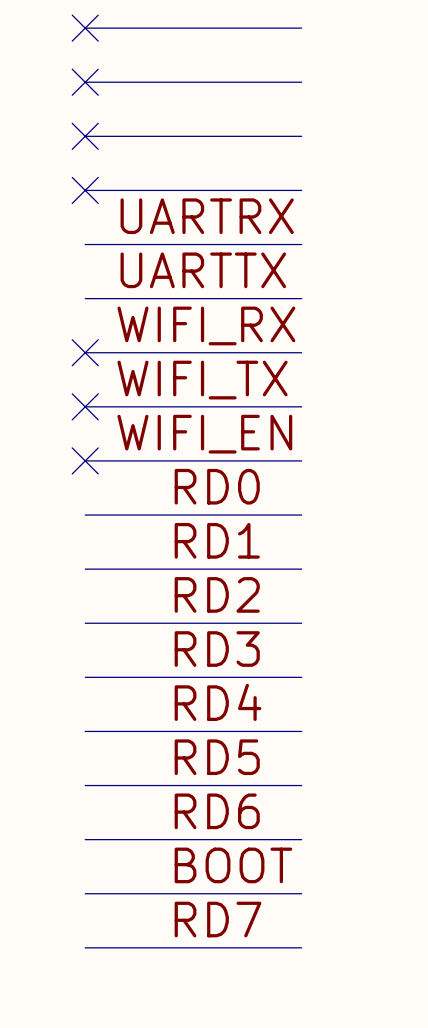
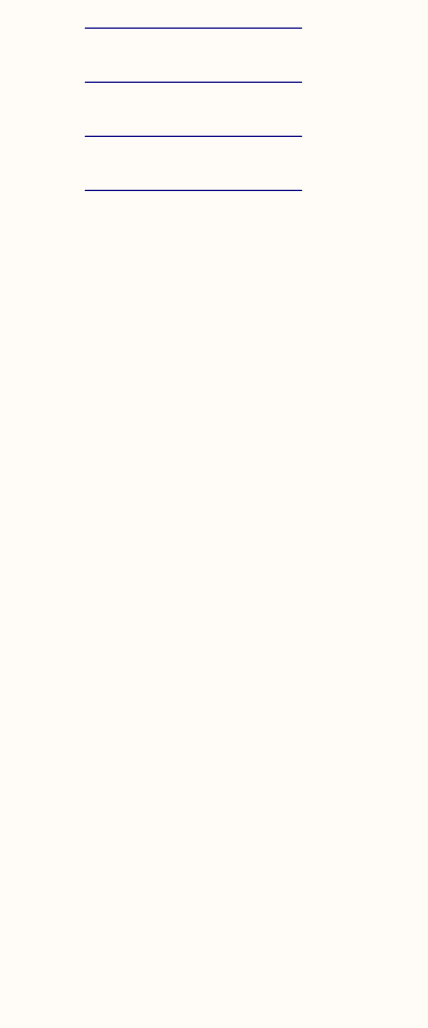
no-connect mark: (85, 28) -> none
no-connect mark: (85, 82) -> none
no-connect mark: (85, 136) -> none
no-connect mark: (85, 190) -> none
label: UARTRX (207, 216) -> none
wire: (85, 244) (301, 244) -> none
label: UARTTX (203, 270) -> none
wire: (85, 298) (301, 298) -> none
label: WIFI_RX (206, 325) -> none
wire: (85, 352) (301, 352) -> none
no-connect mark: (85, 352) -> none
label: WIFI_TX (202, 380) -> none
wire: (85, 406) (301, 406) -> none
no-connect mark: (85, 406) -> none
label: WIFI_EN (204, 434) -> none
wire: (85, 460) (301, 460) -> none
no-connect mark: (85, 460) -> none
label: RD0 (217, 486) -> none
wire: (85, 515) (301, 515) -> none
label: RD1 (217, 540) -> none
wire: (85, 569) (301, 569) -> none
label: RD2 (217, 594) -> none
wire: (85, 623) (301, 623) -> none
label: RD3 (217, 649) -> none
wire: (85, 677) (301, 677) -> none
label: RD4 (217, 702) -> none
wire: (85, 731) (301, 731) -> none
label: RD5 (217, 757) -> none
wire: (85, 785) (301, 785) -> none
label: RD6 (217, 811) -> none
wire: (85, 839) (301, 839) -> none
label: BOOT (233, 865) -> none
wire: (85, 893) (301, 893) -> none
label: RD7 (217, 919) -> none
wire: (85, 947) (301, 947) -> none

